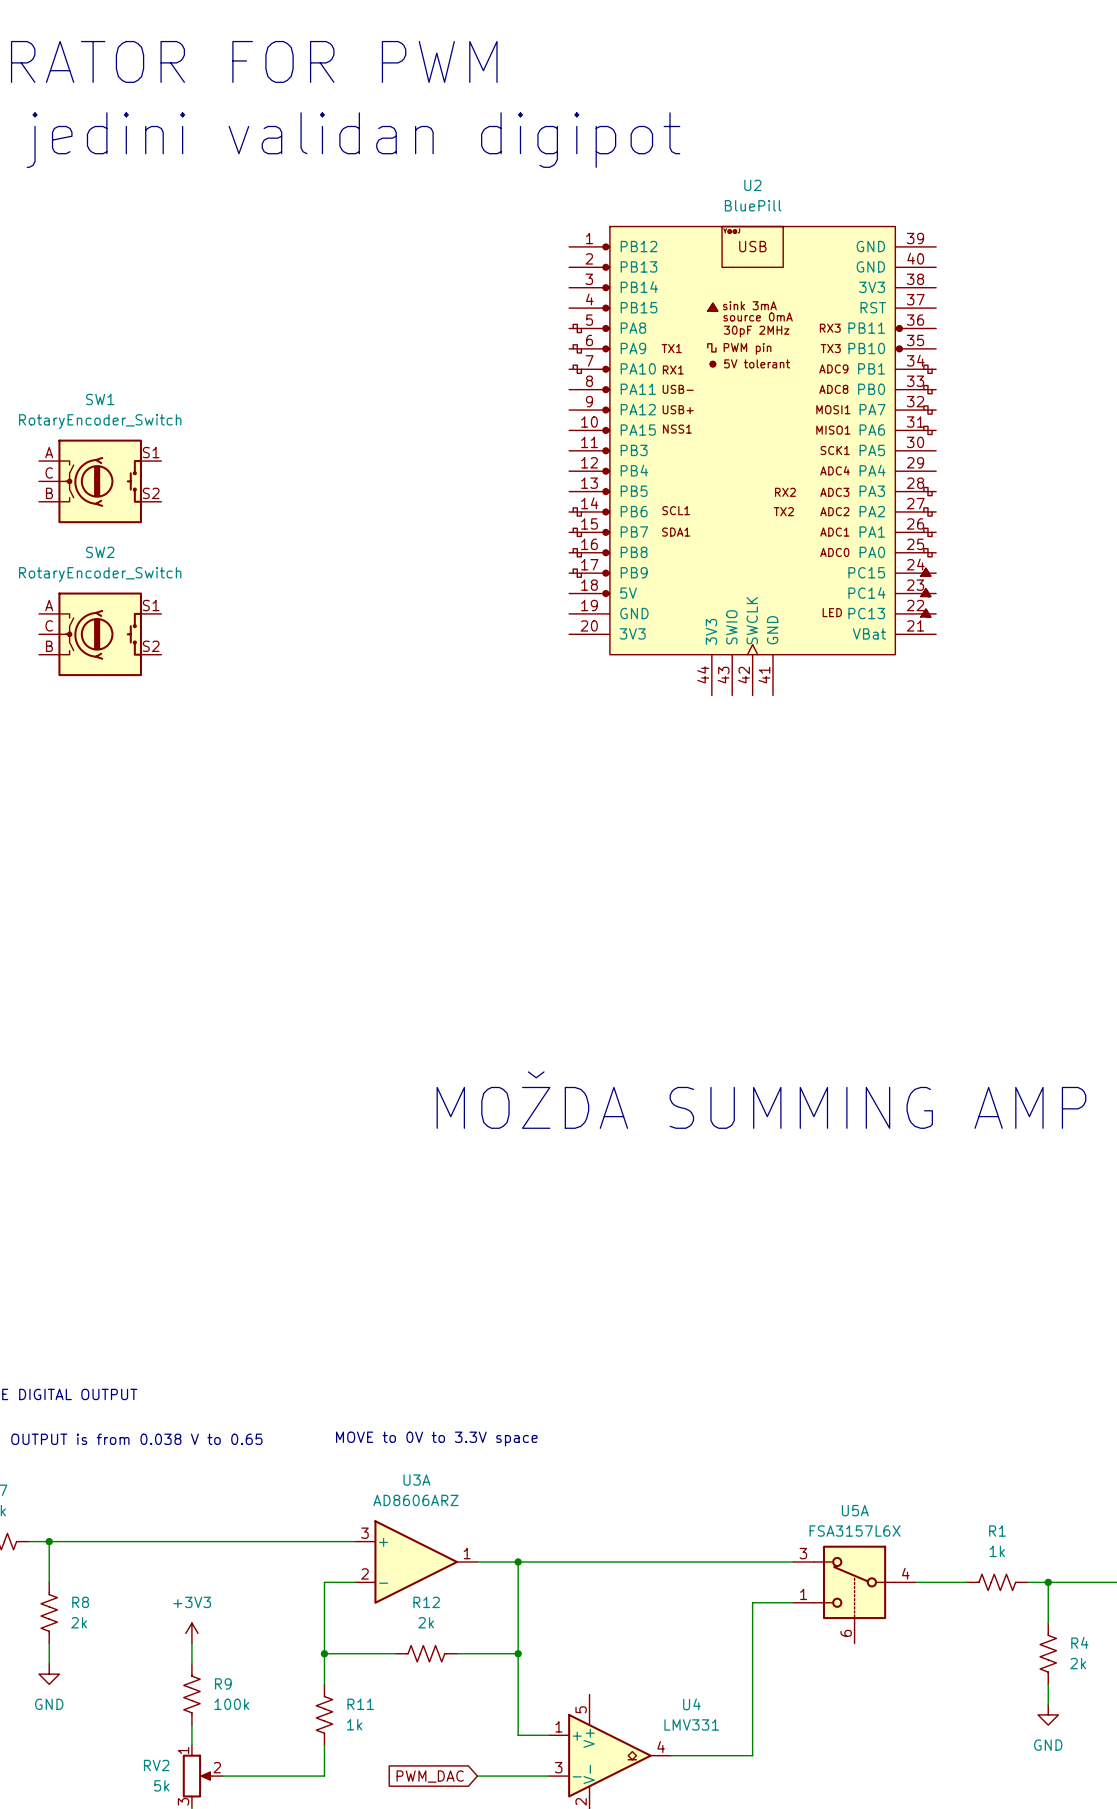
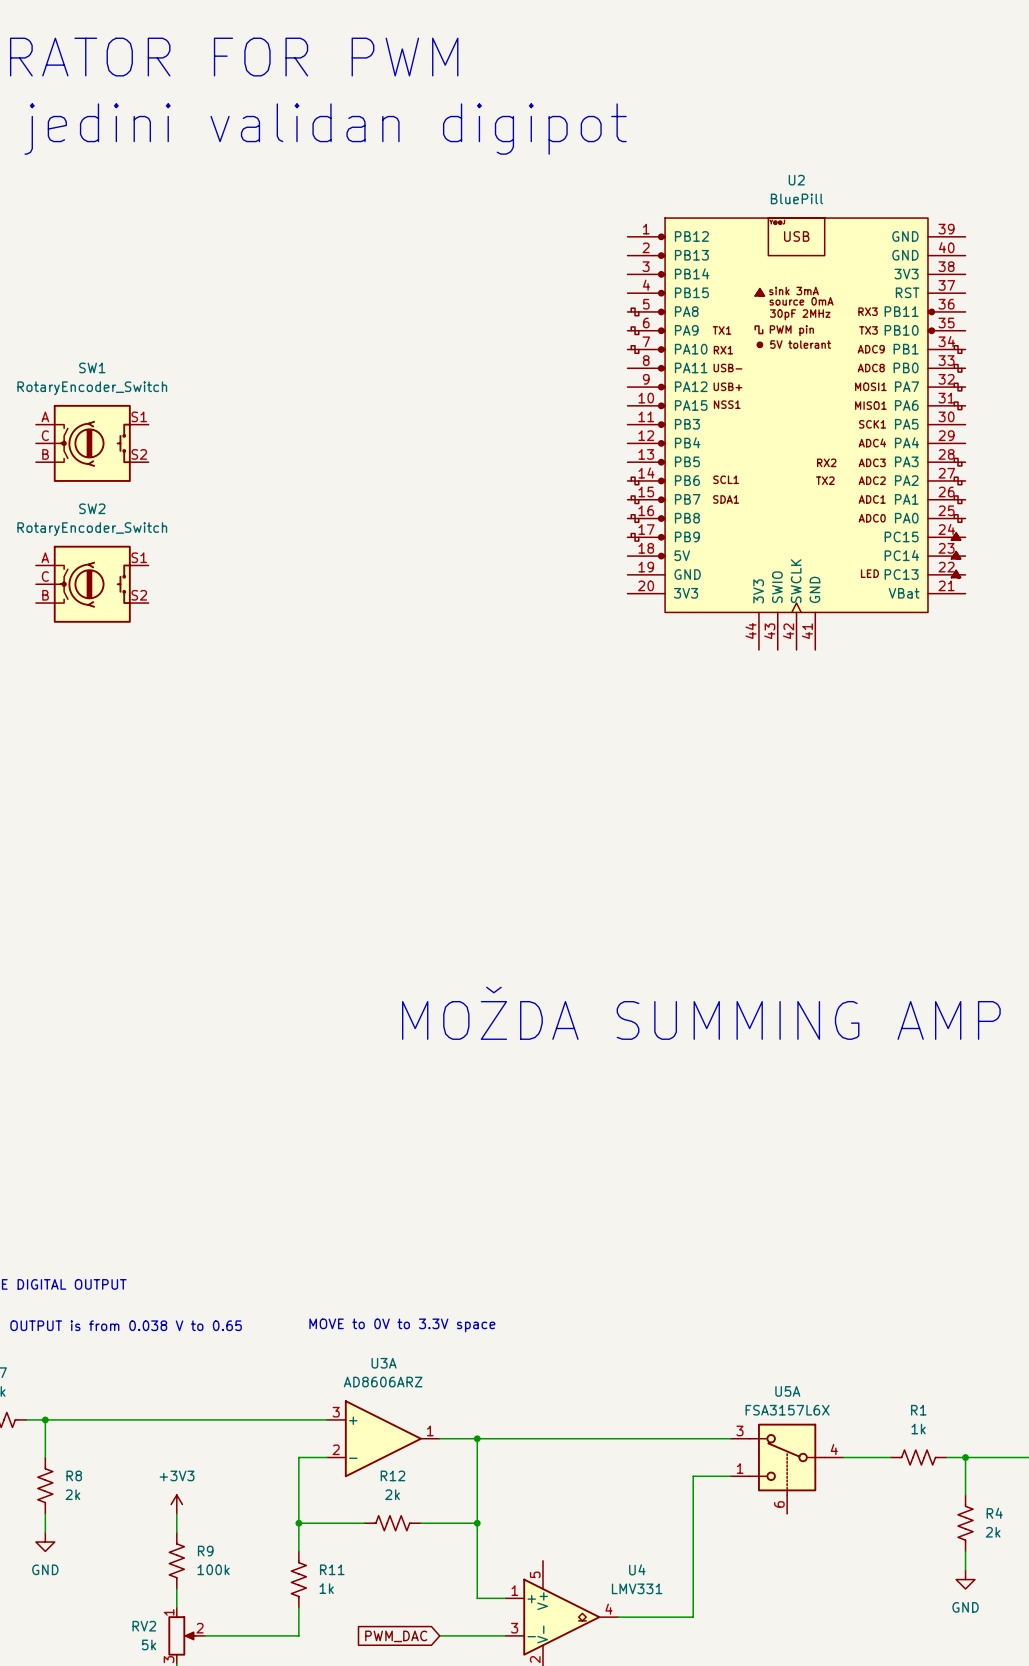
U2 symbol: [569, 226, 937, 696] -> [627, 218, 966, 650]

